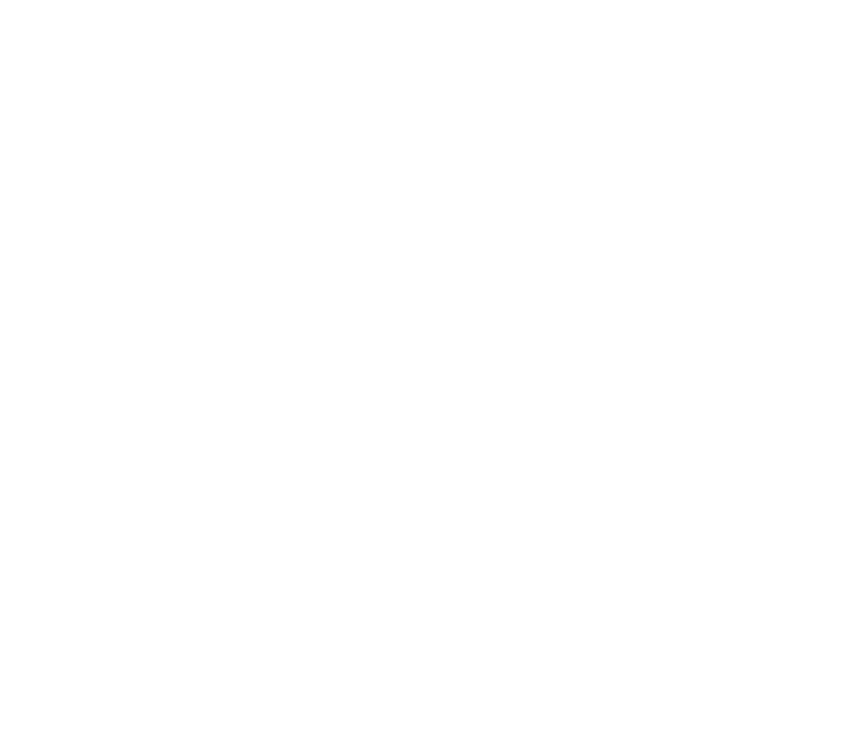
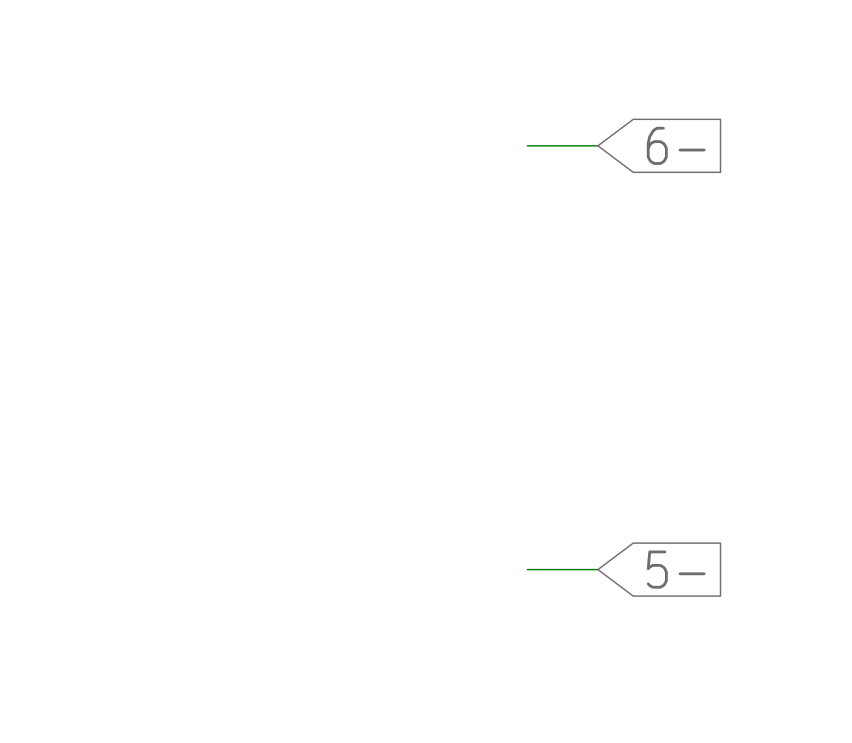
wire: none -> (527, 145) (597, 145)
global label: none -> 6- (676, 145)
wire: none -> (527, 569) (597, 569)
global label: none -> 5- (676, 569)

